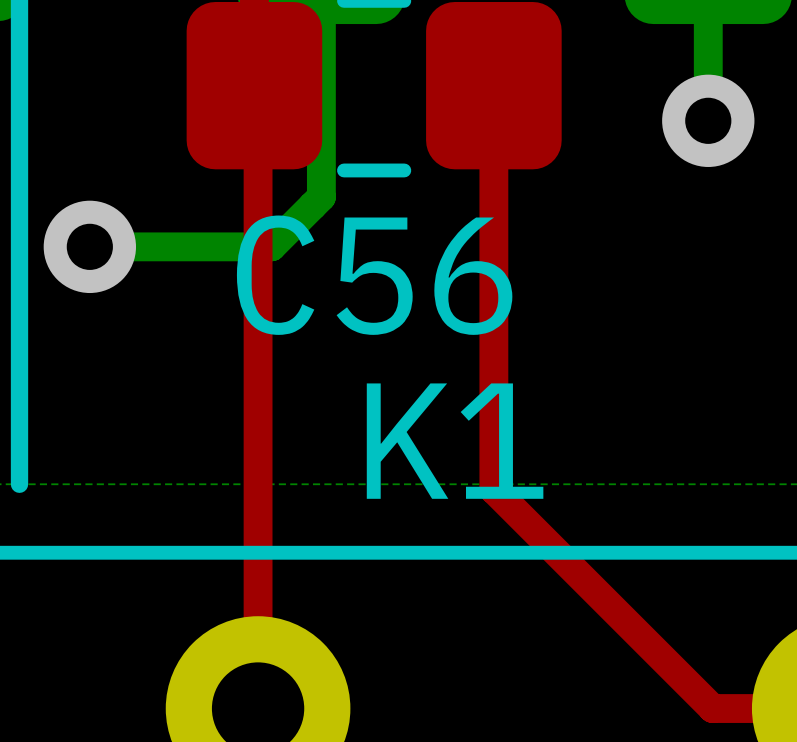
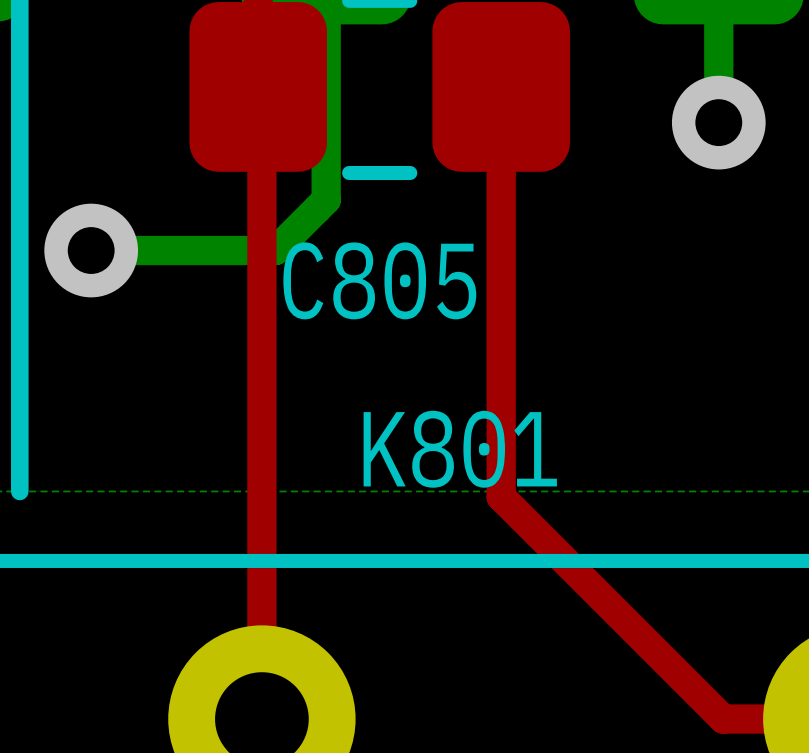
C56 name: C56 (374, 275) -> C805 (379, 280)
K1 name: K1 (455, 441) -> K801 (460, 449)

